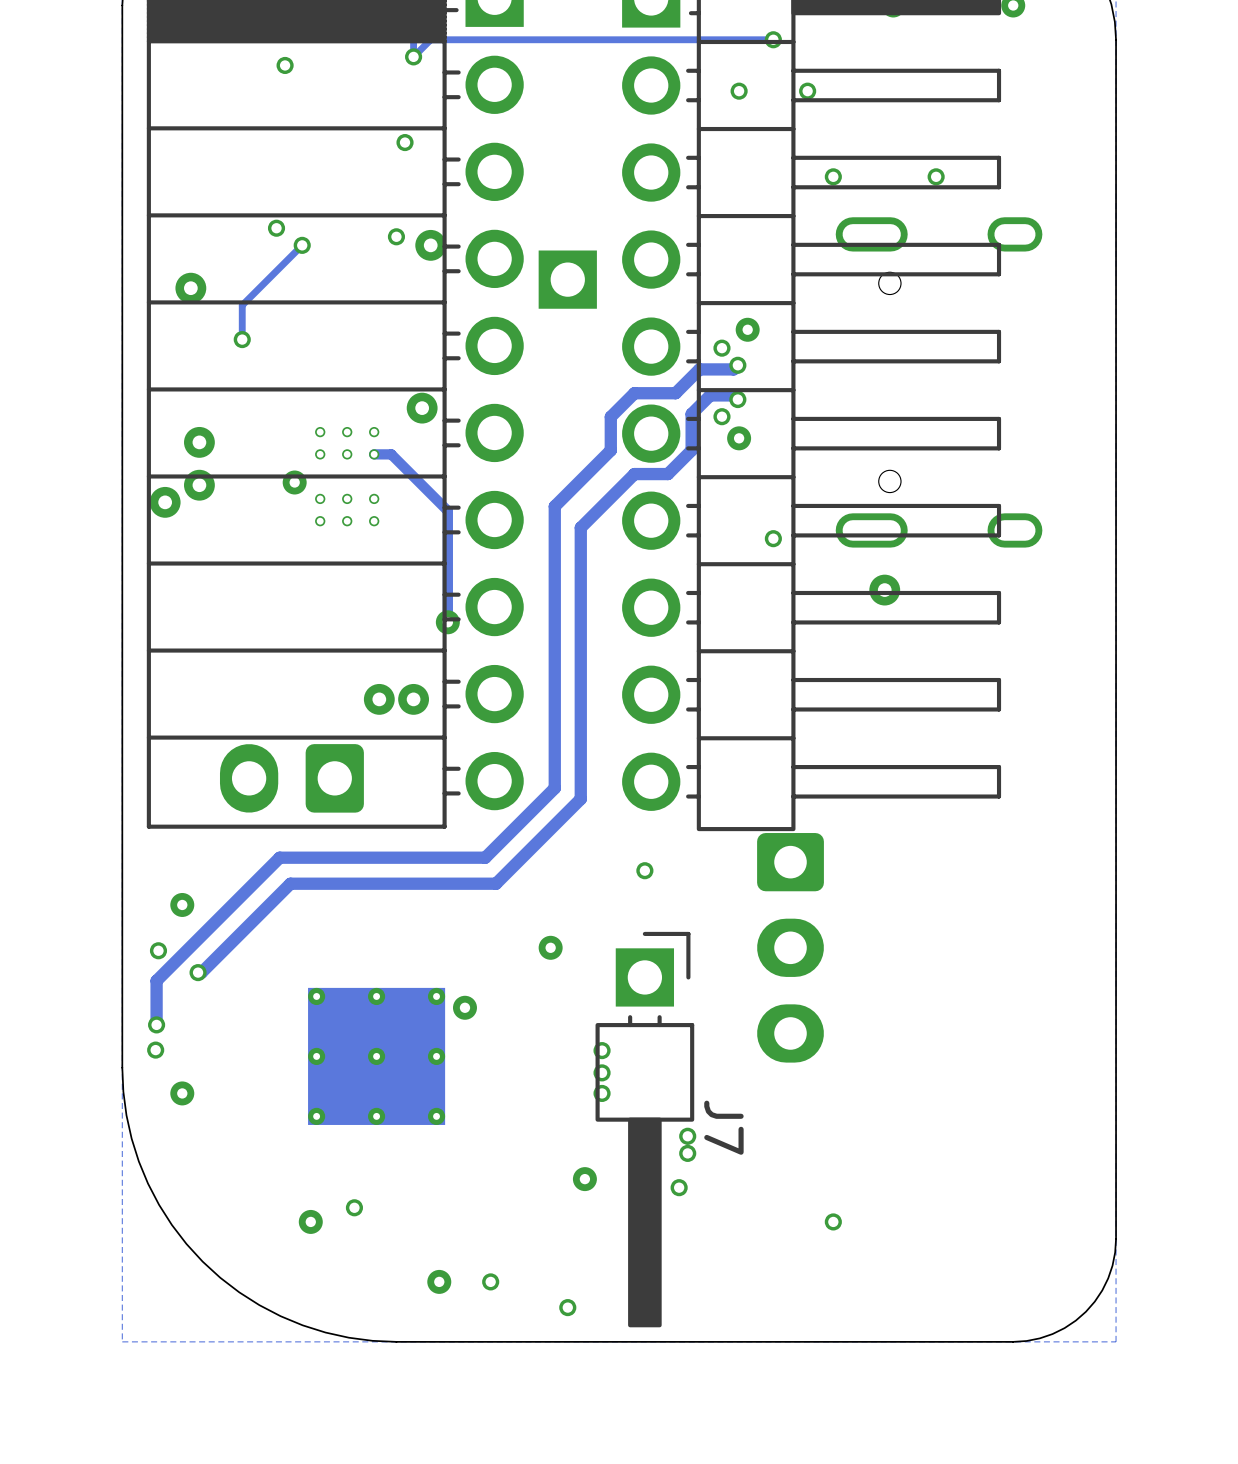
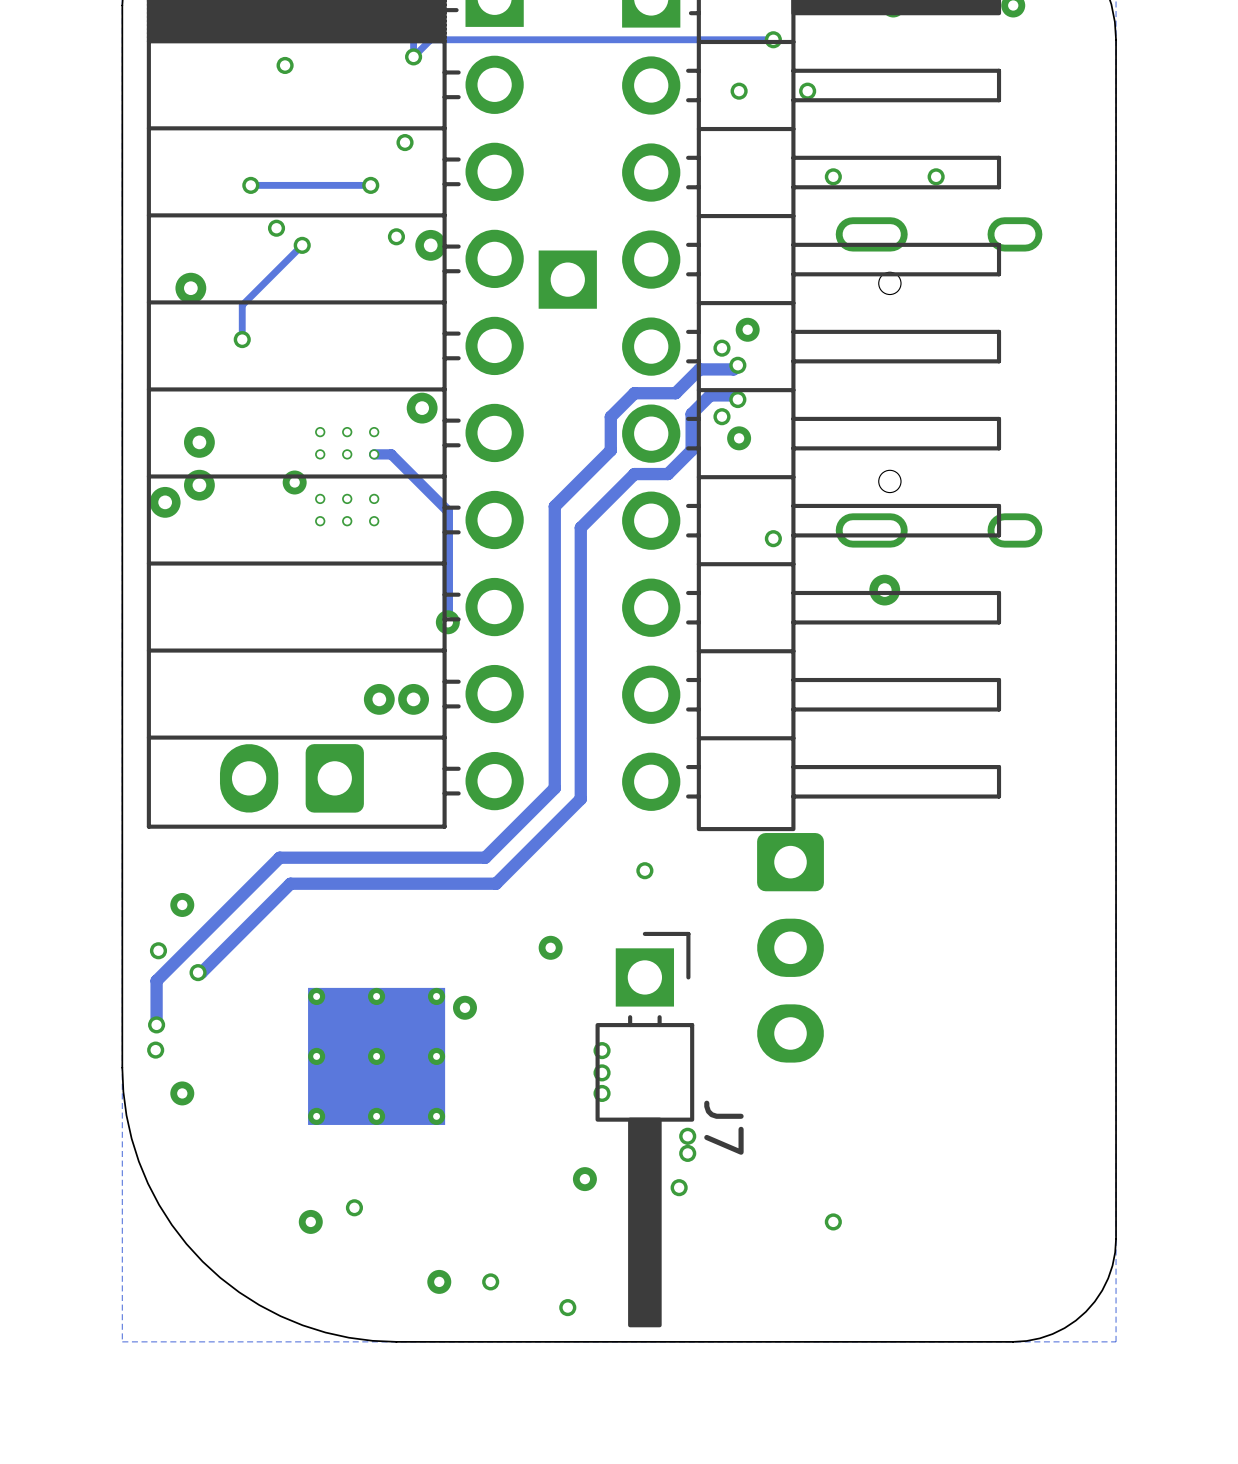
via: none -> (250, 185)
track: none -> (370, 185) (250, 185)
via: none -> (370, 185)

